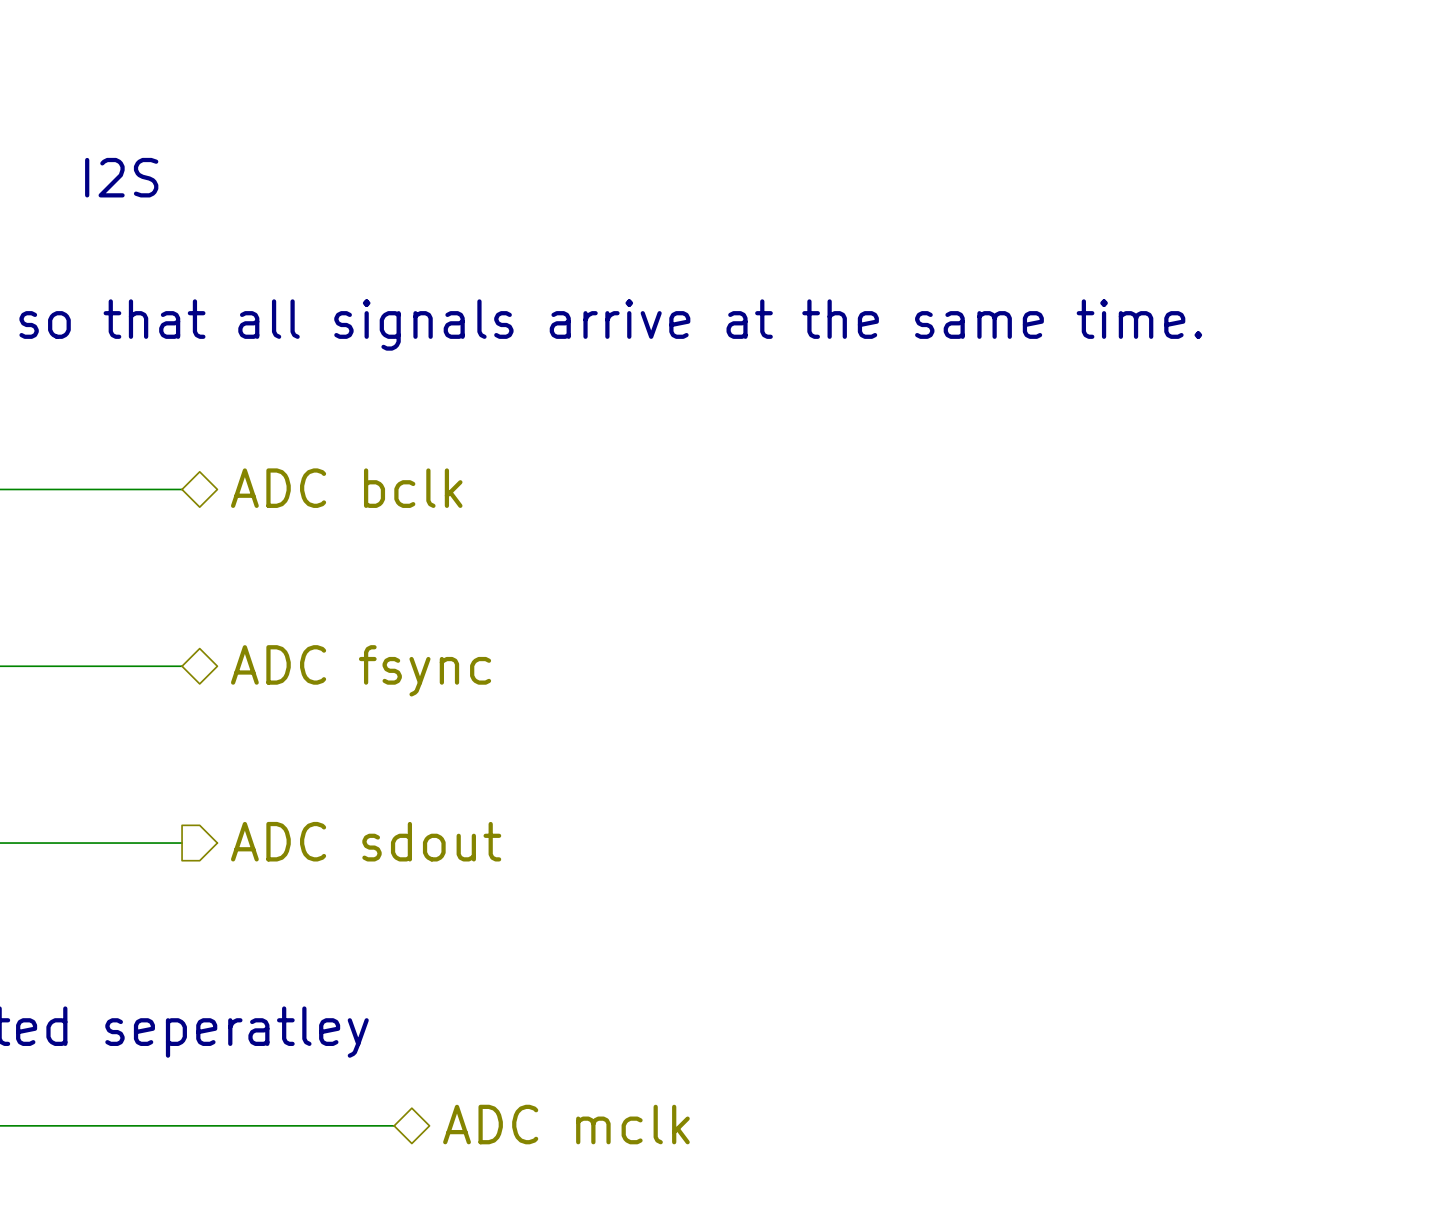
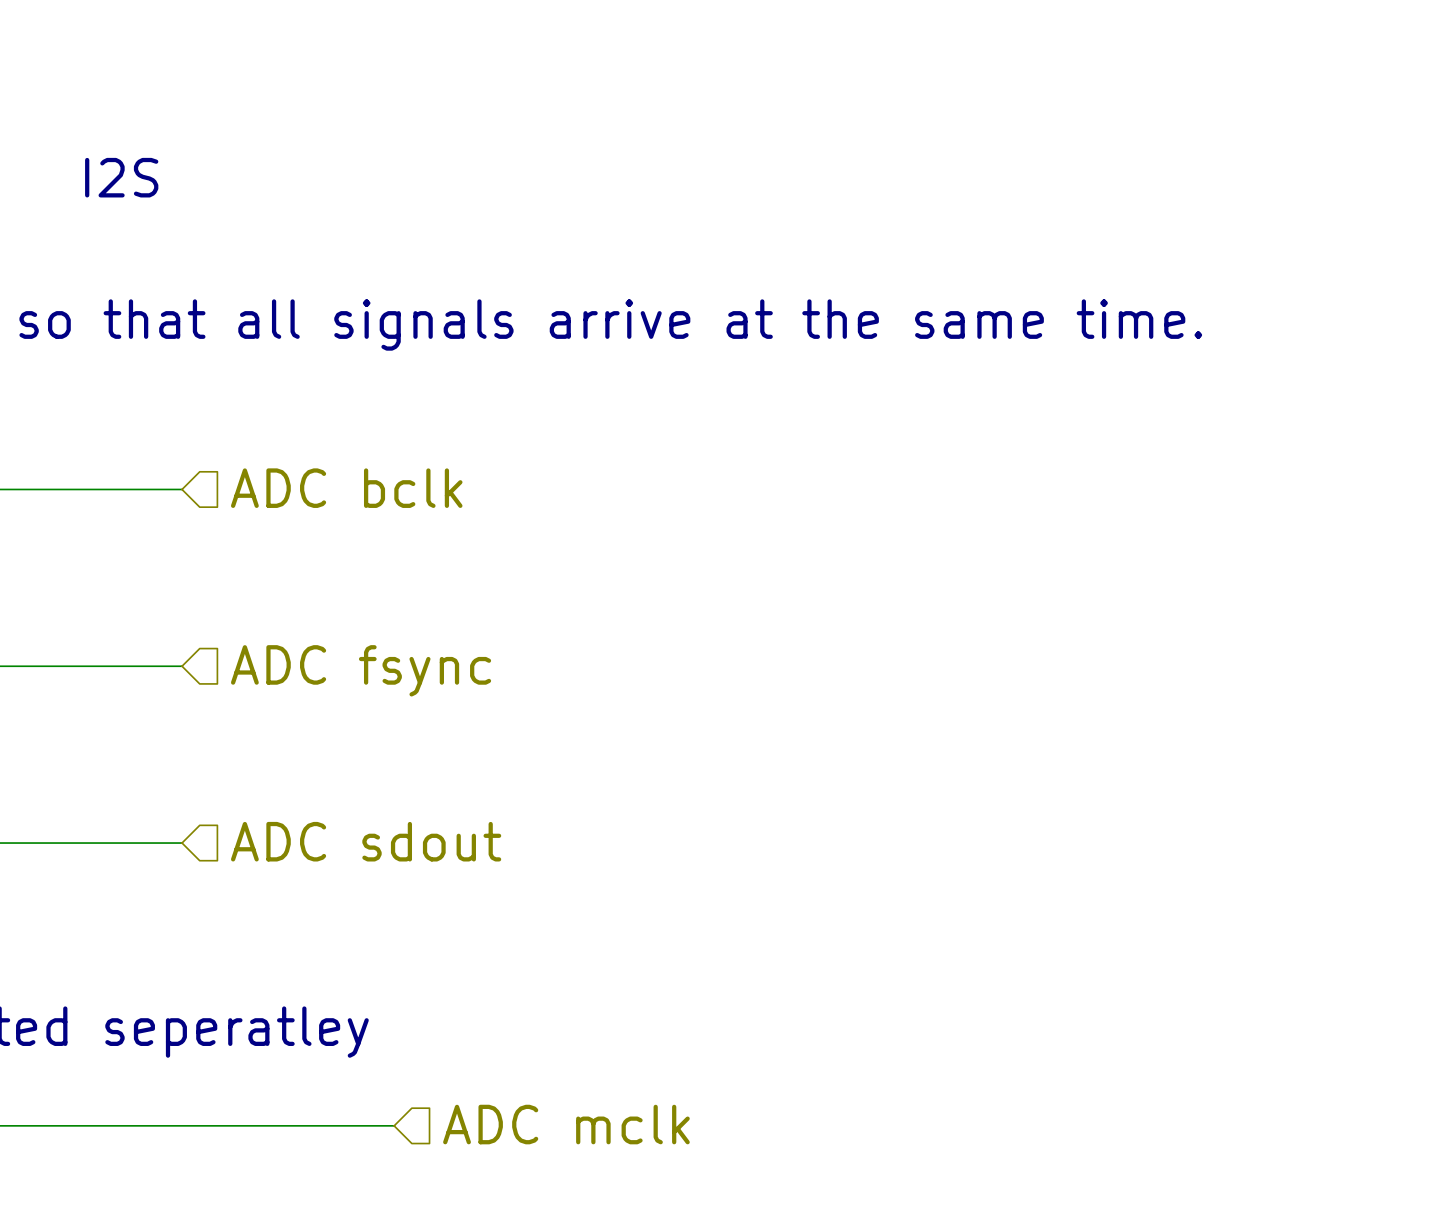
hierarchical label shape: bidirectional (346, 488) -> input (346, 488)
hierarchical label shape: bidirectional (361, 670) -> input (361, 670)
hierarchical label shape: output (366, 841) -> input (366, 841)
hierarchical label shape: bidirectional (566, 1124) -> input (566, 1124)

